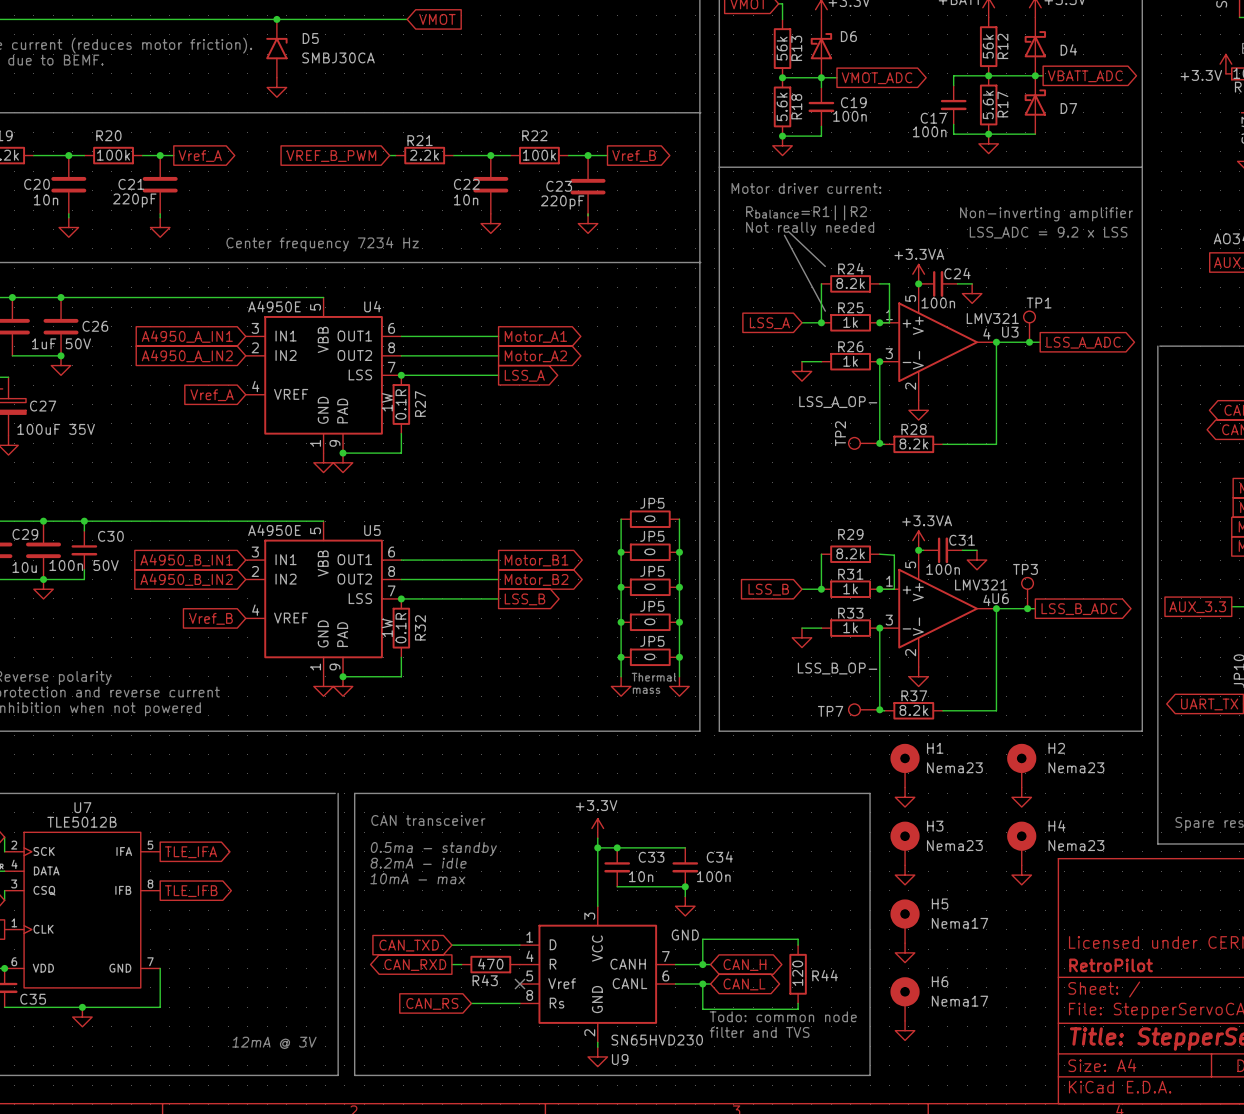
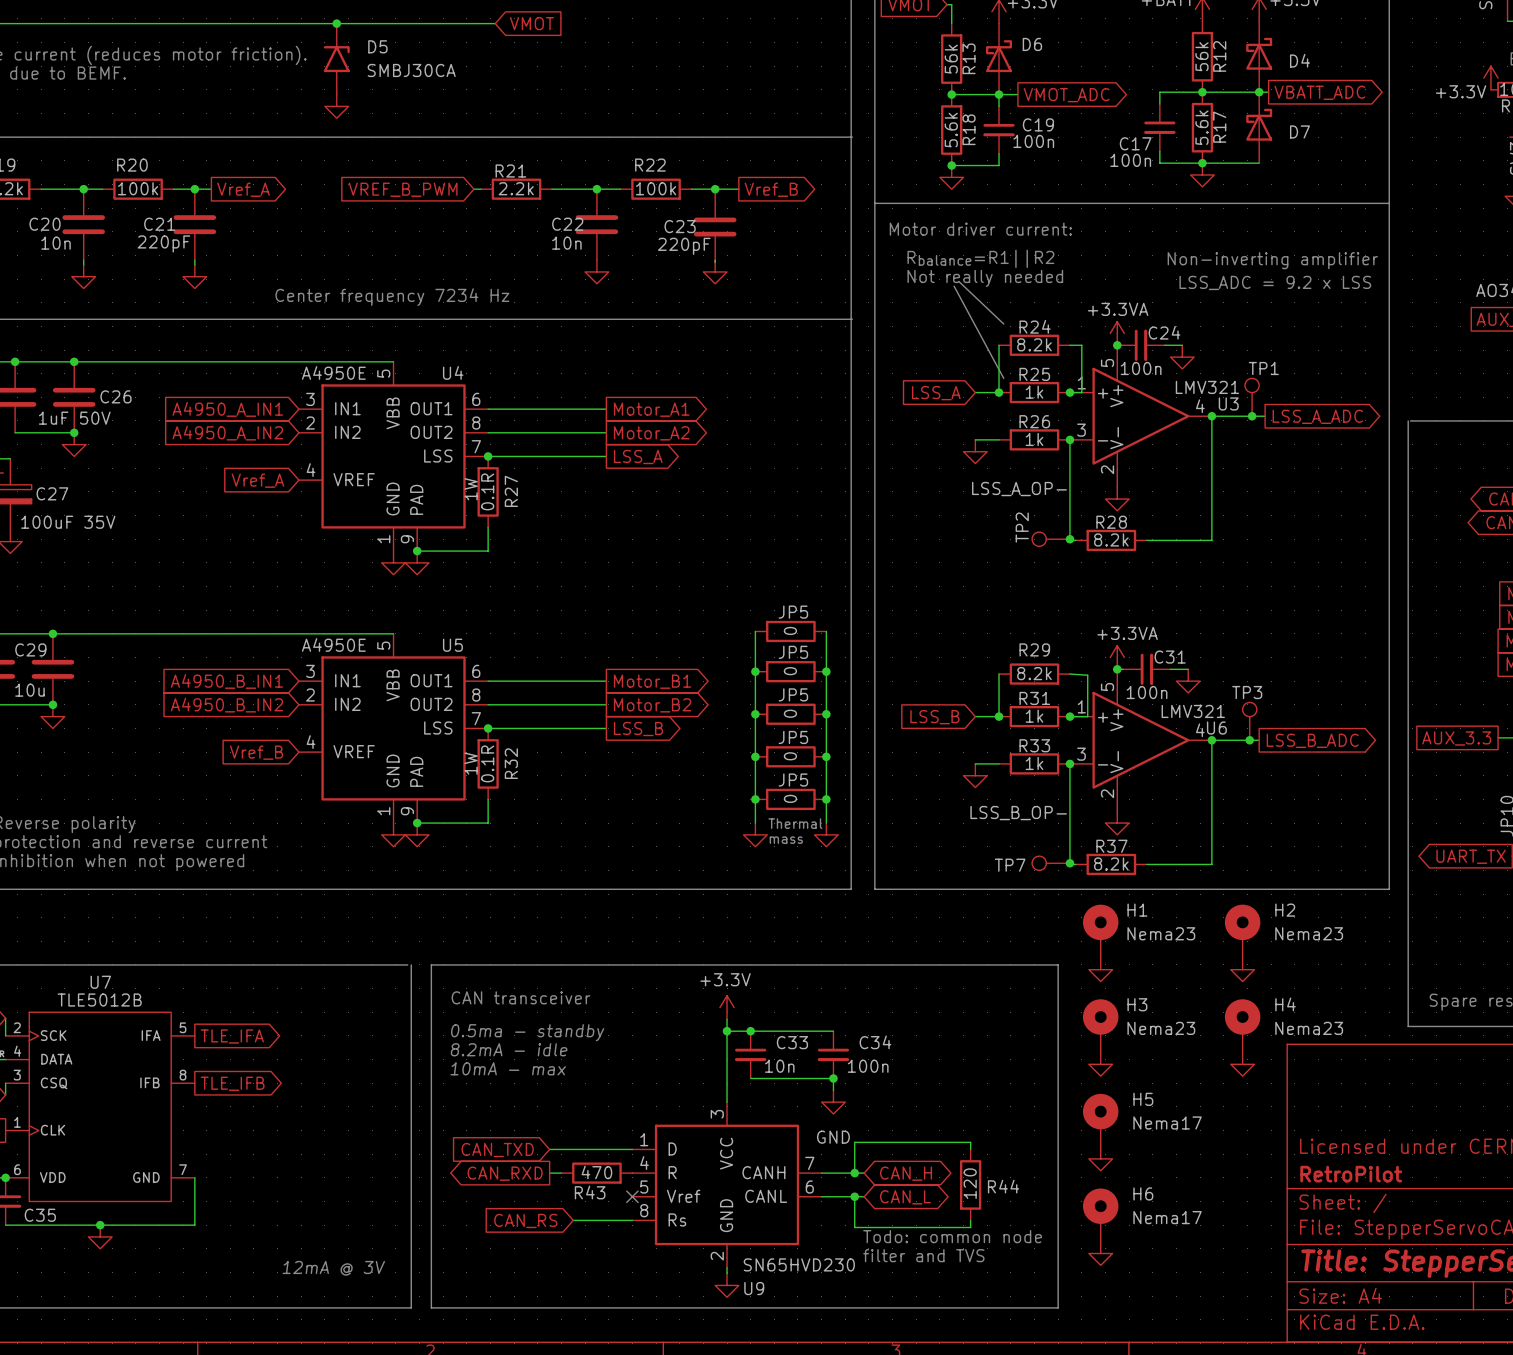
wire: (84, 521) (84, 530) -> none
junction: (84, 521) -> none
C30: 100n 50V (84, 550) -> none
wire: (84, 569) (84, 579) (43, 579) -> none

